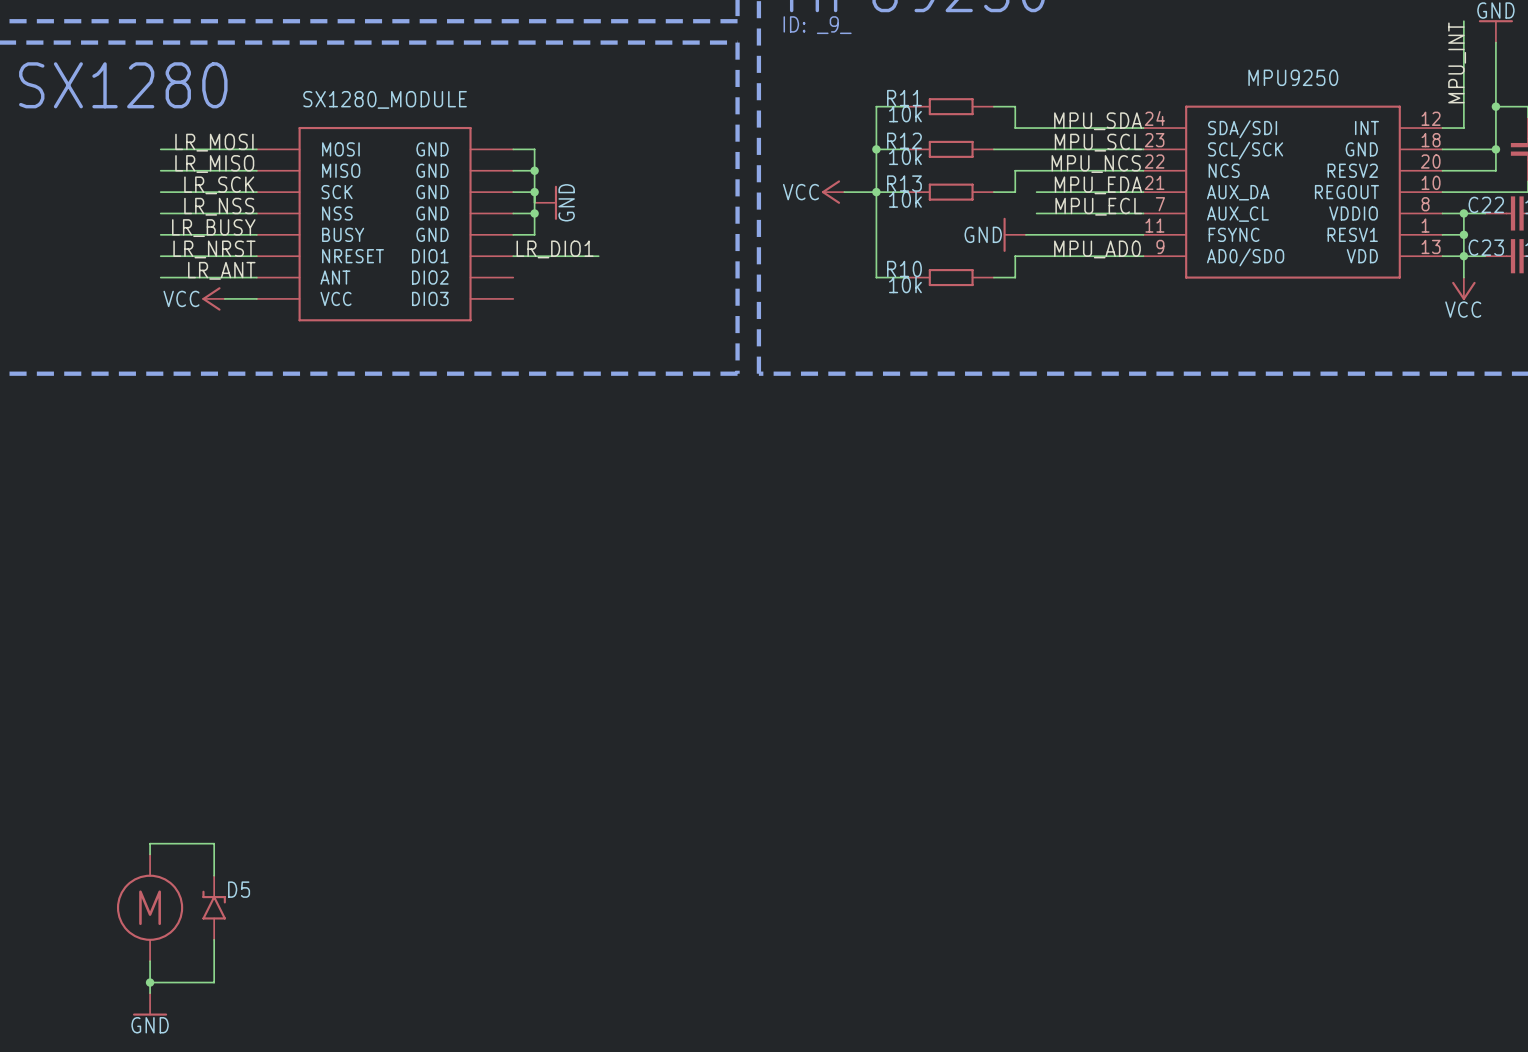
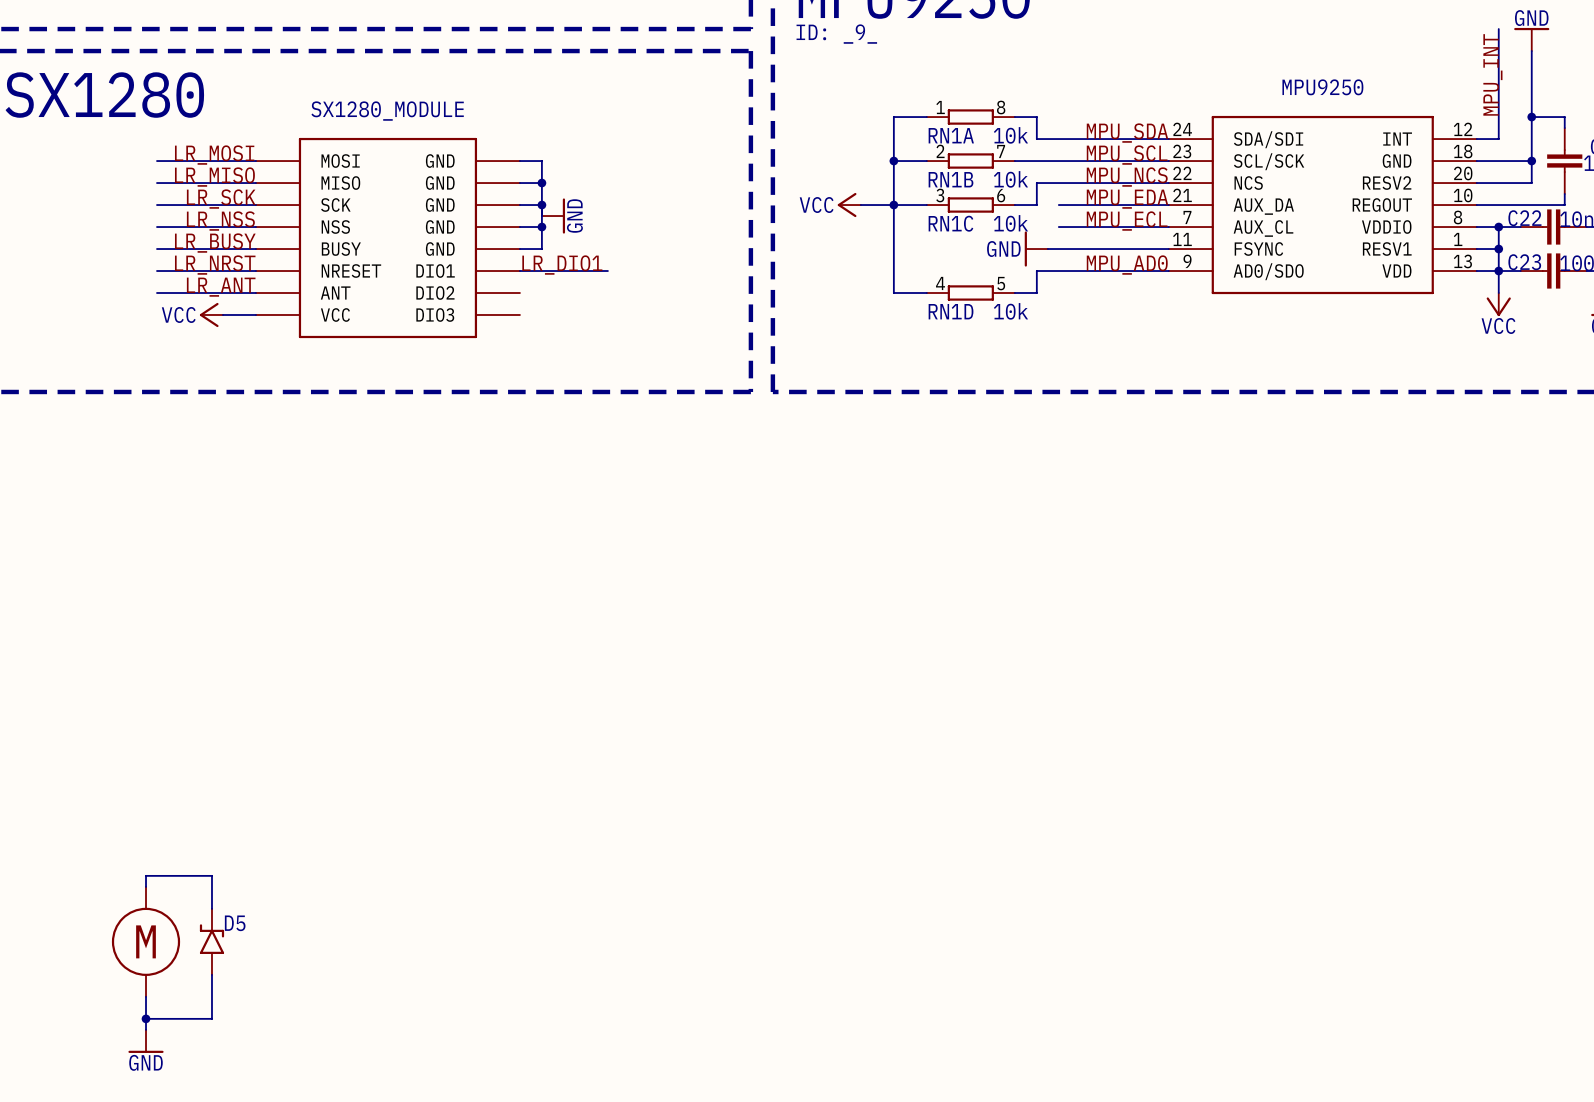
R11: 10k (951, 106) -> none
RN1A: none -> 10k (970, 117)
R12: 10k (951, 149) -> none
RN1B: none -> 10k (970, 161)
R13: 10k (951, 192) -> none
RN1C: none -> 10k (970, 205)
R10: 10k (951, 277) -> none
RN1D: none -> 10k (970, 293)

